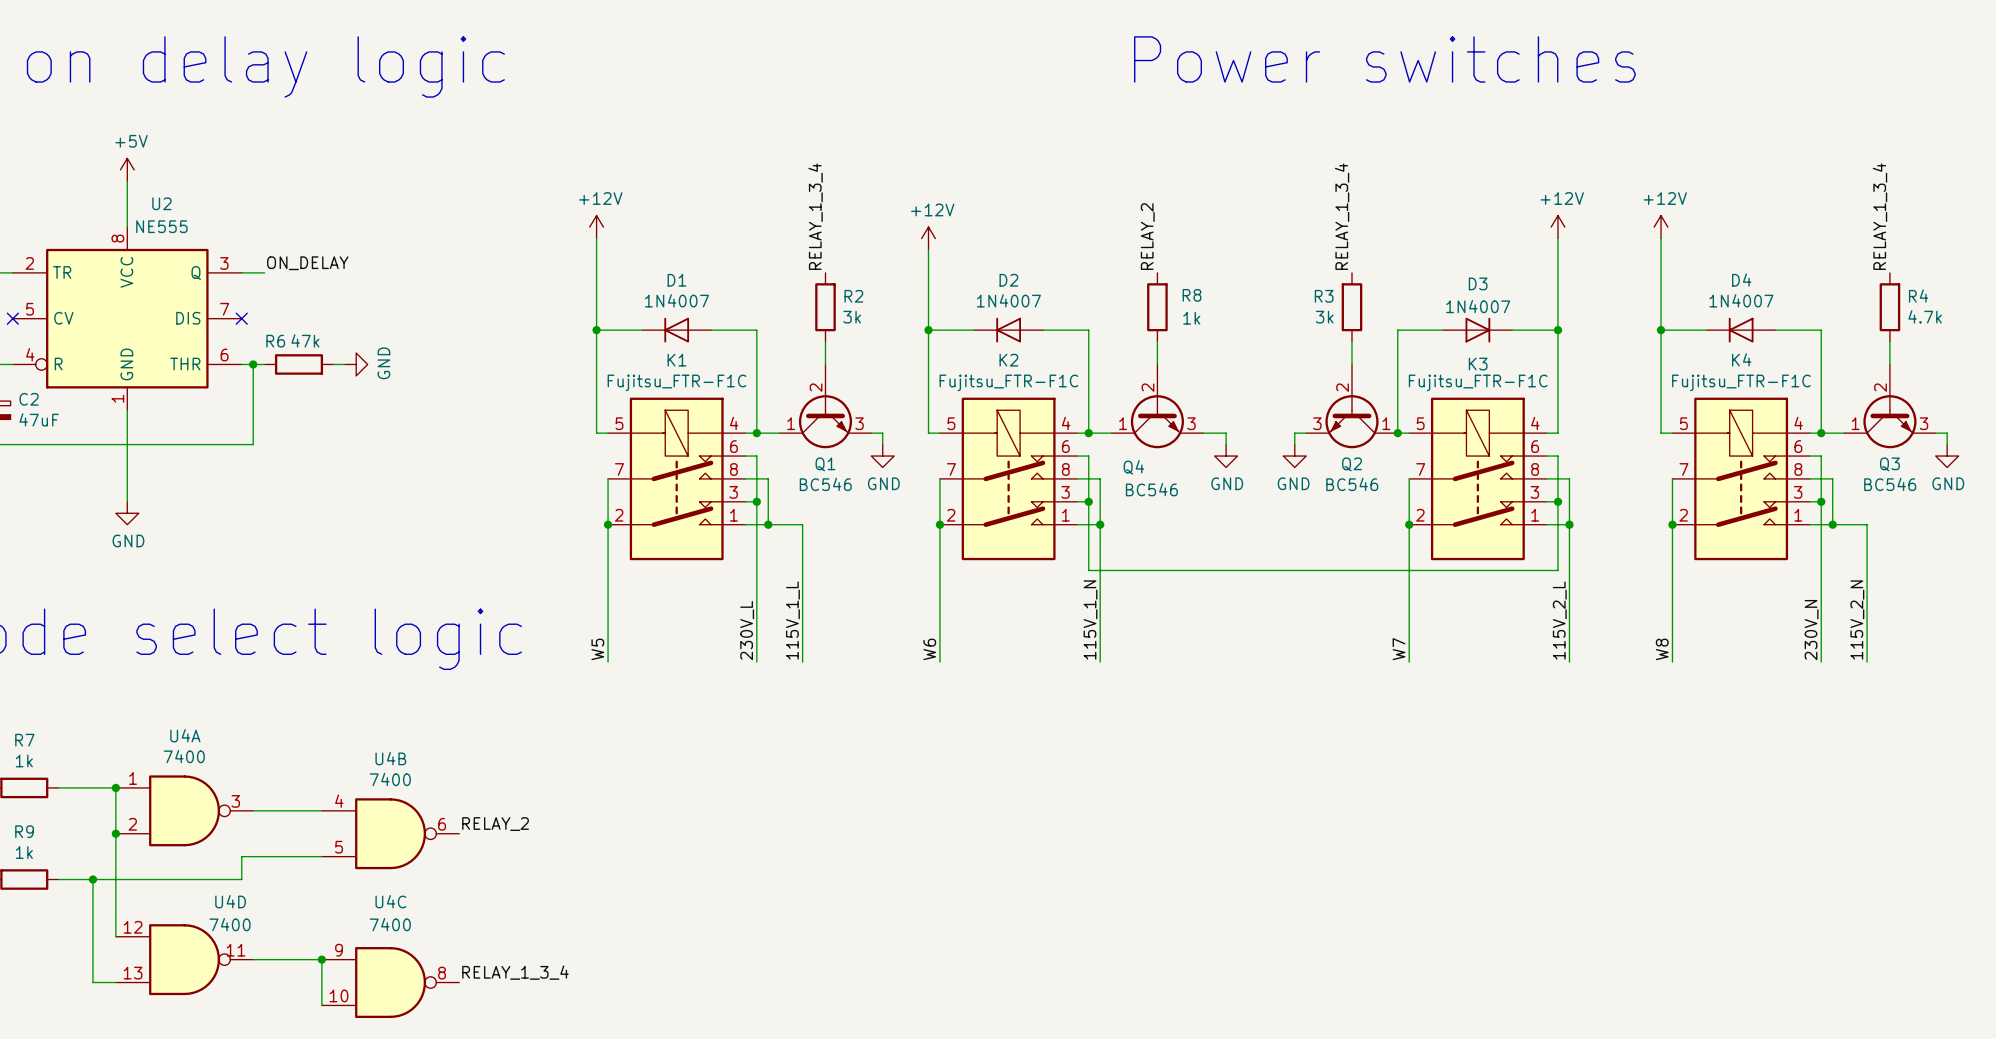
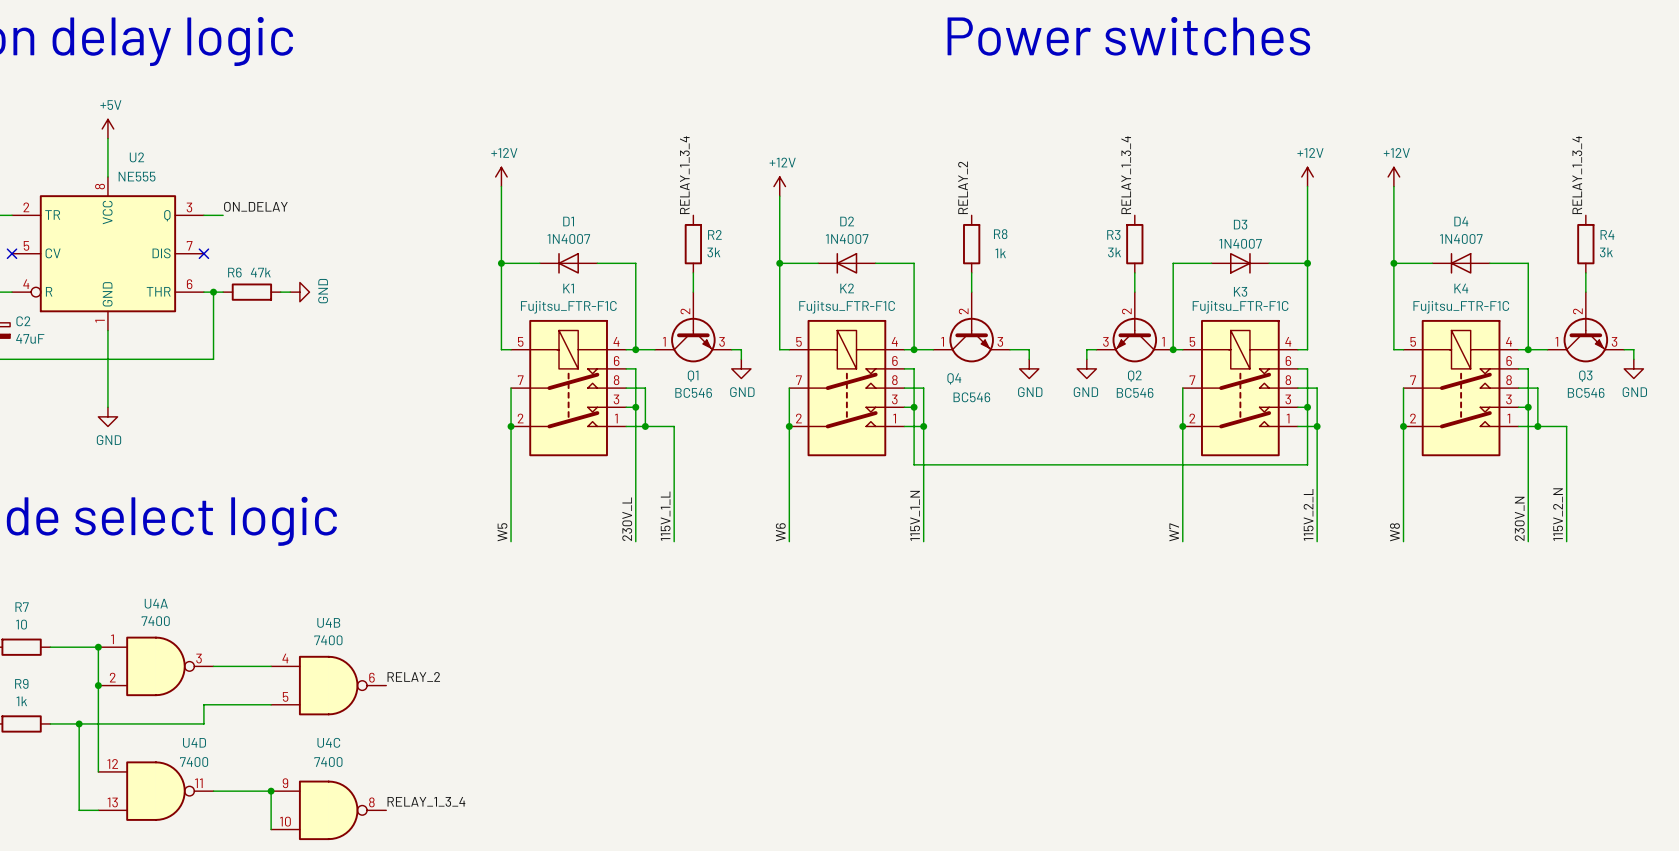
R4 value: 4.7k (1925, 316) -> 3k (1606, 252)
R7 value: 1k (24, 760) -> 10 (21, 624)

